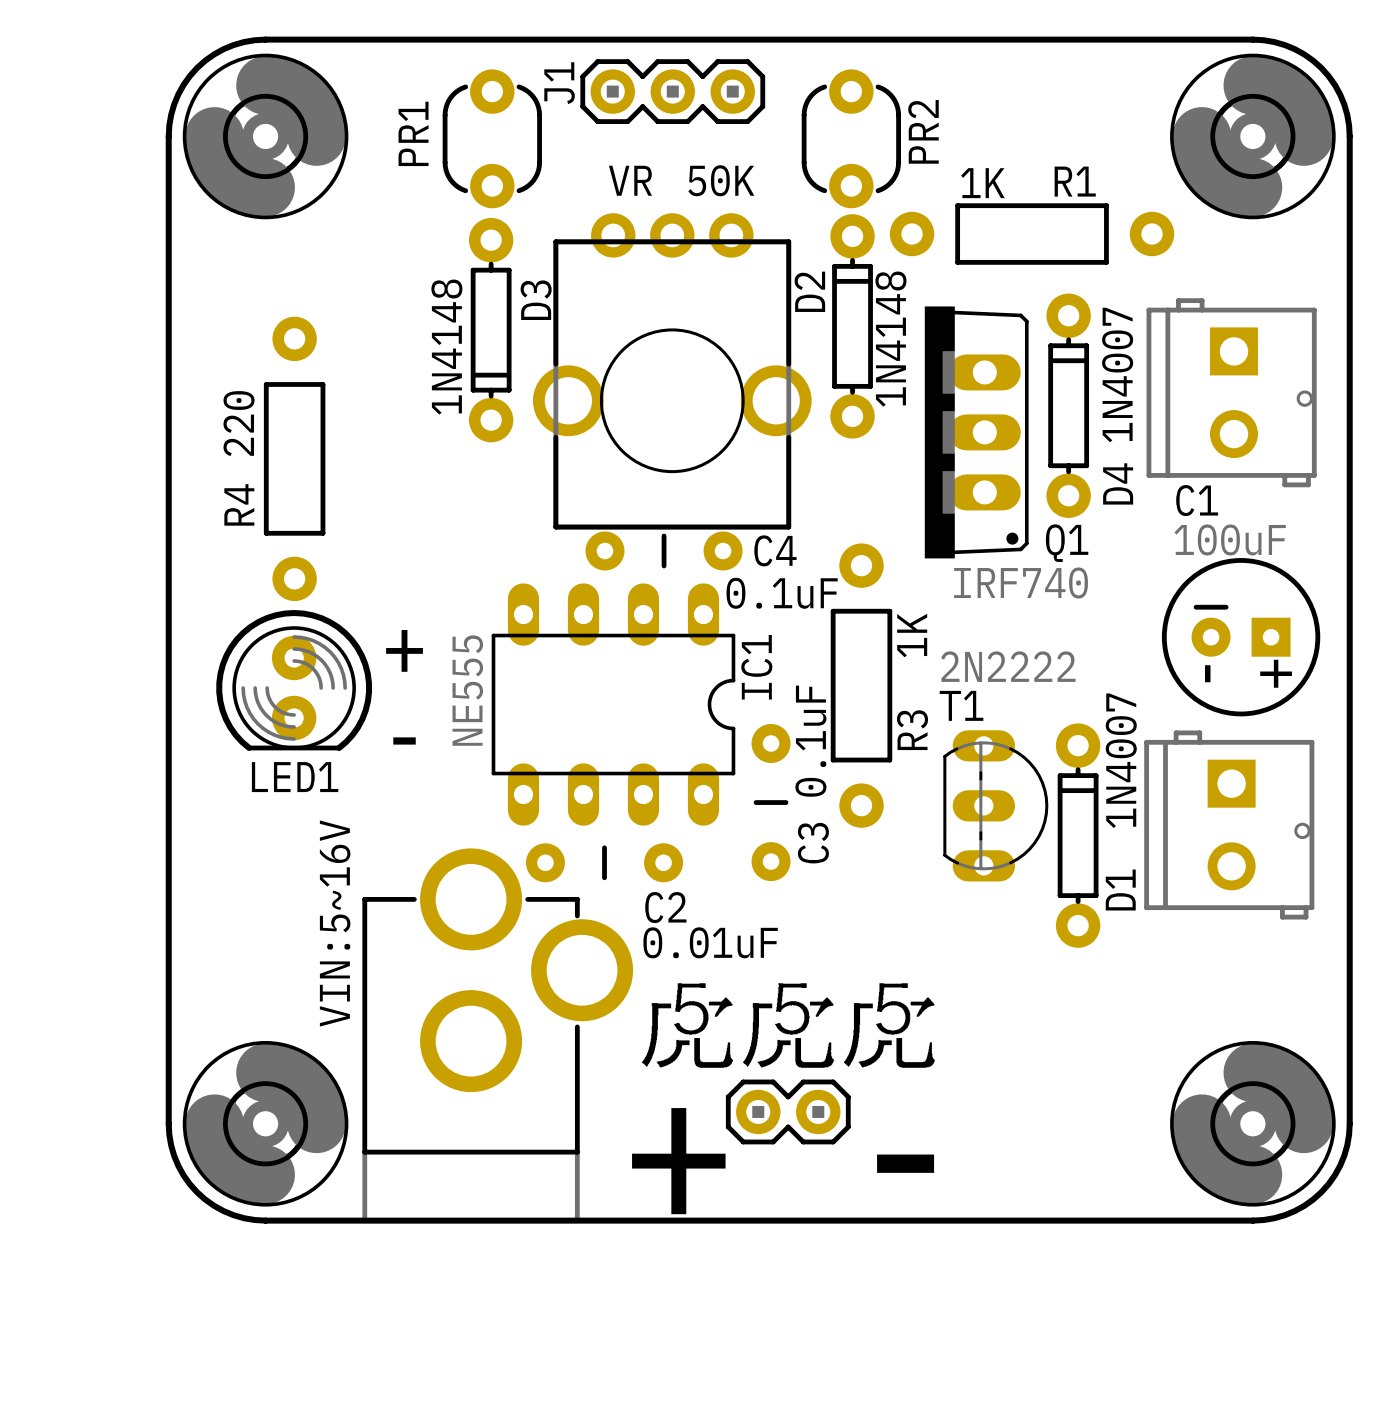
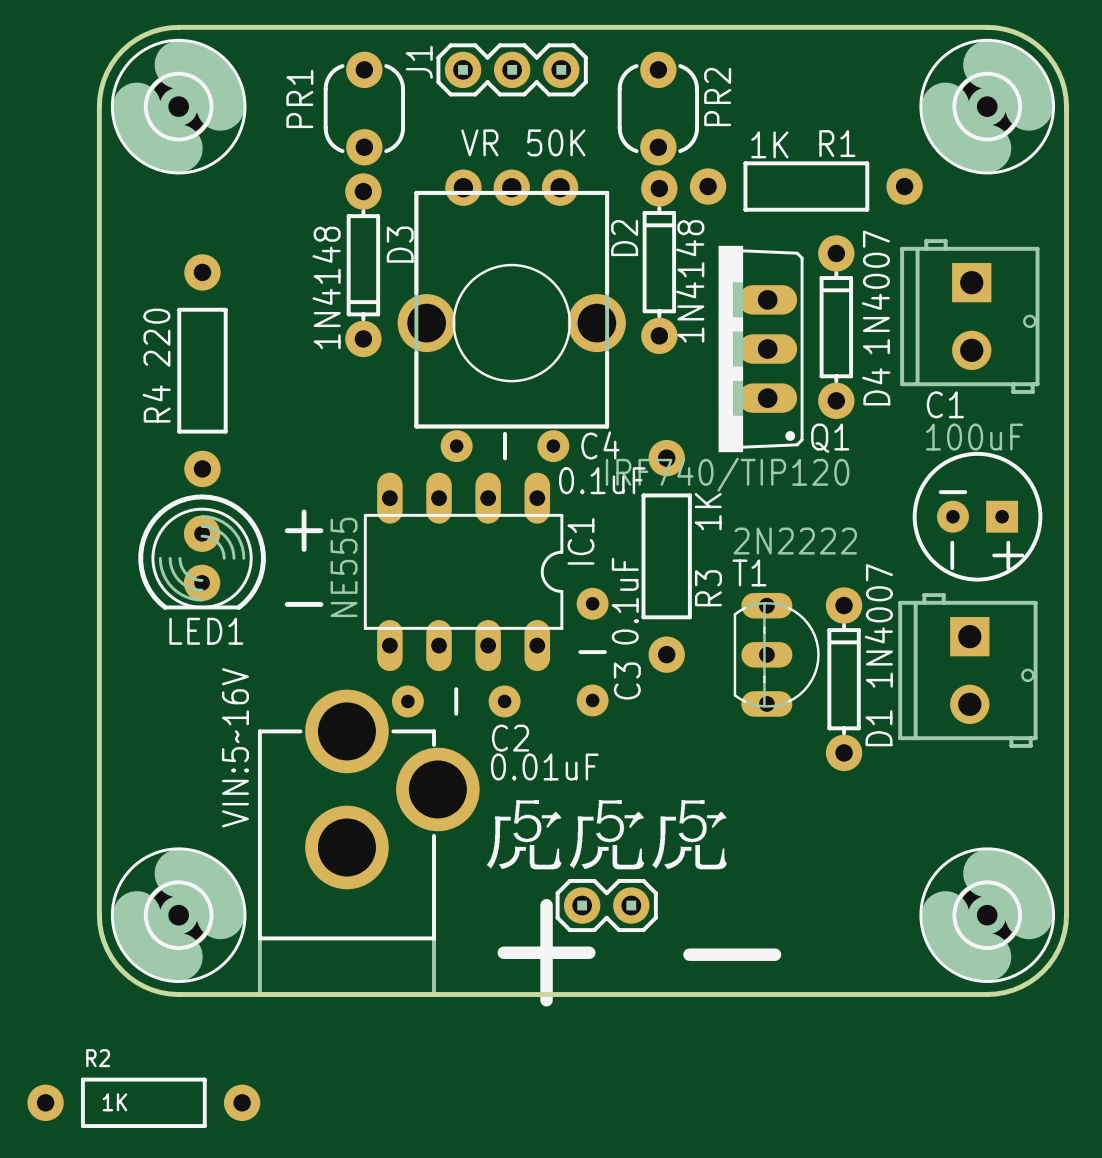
Q1 value: IRF740 (1021, 583) -> IRF740/TIP120 (727, 474)
R2: none -> 1K (143, 1102)

